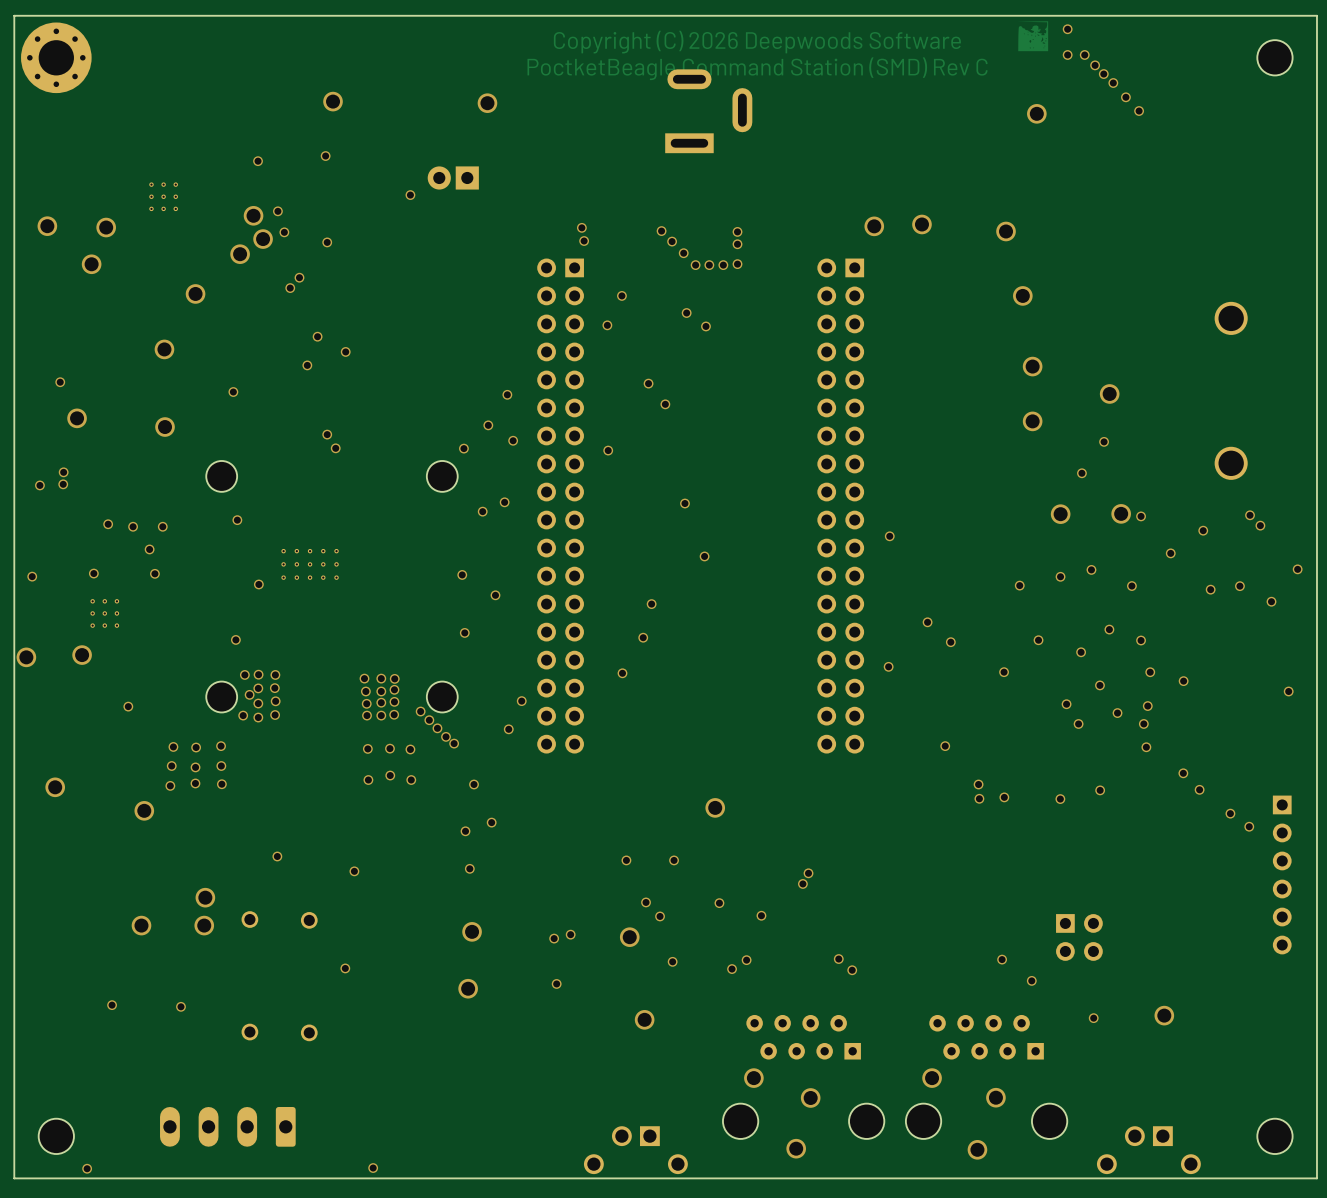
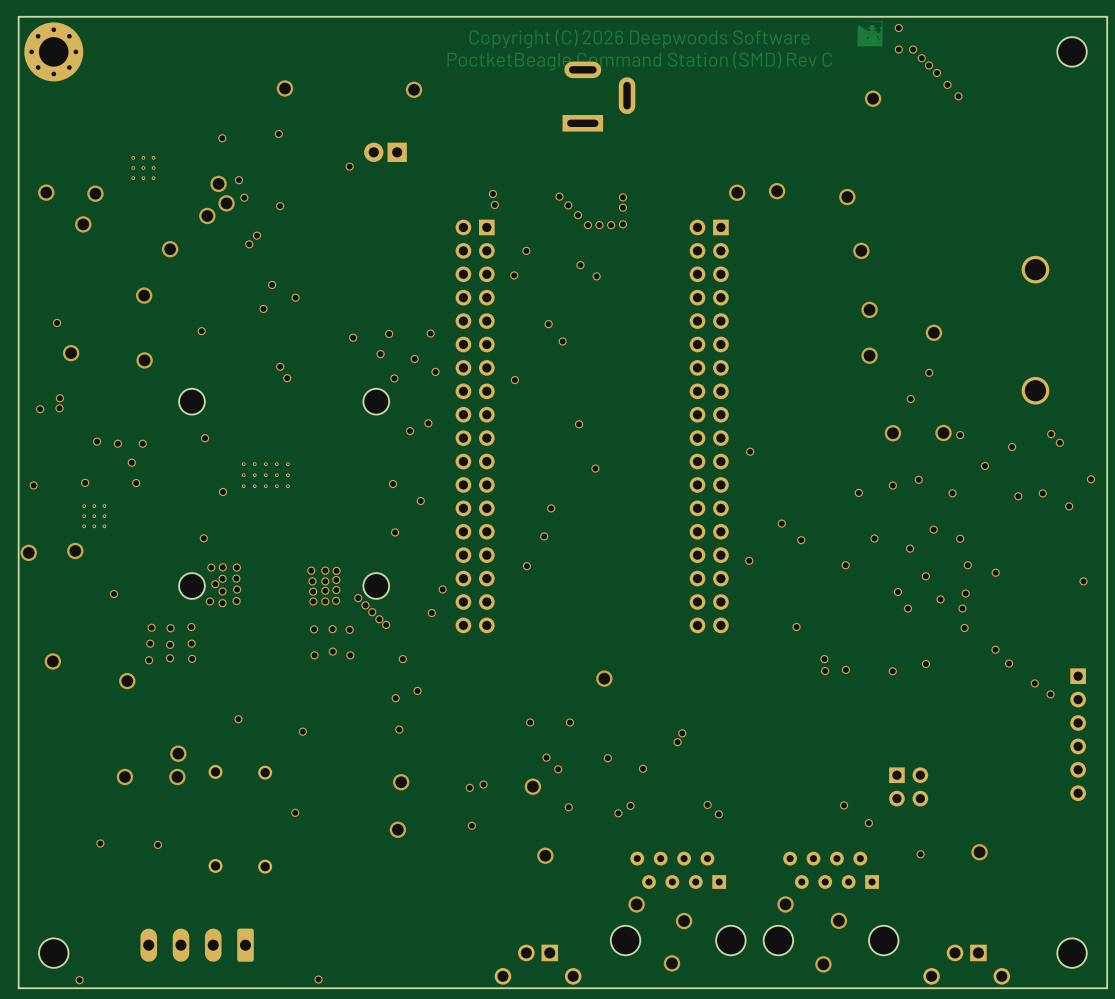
via: none -> (389, 333)
via: none -> (353, 337)
via: none -> (380, 354)

